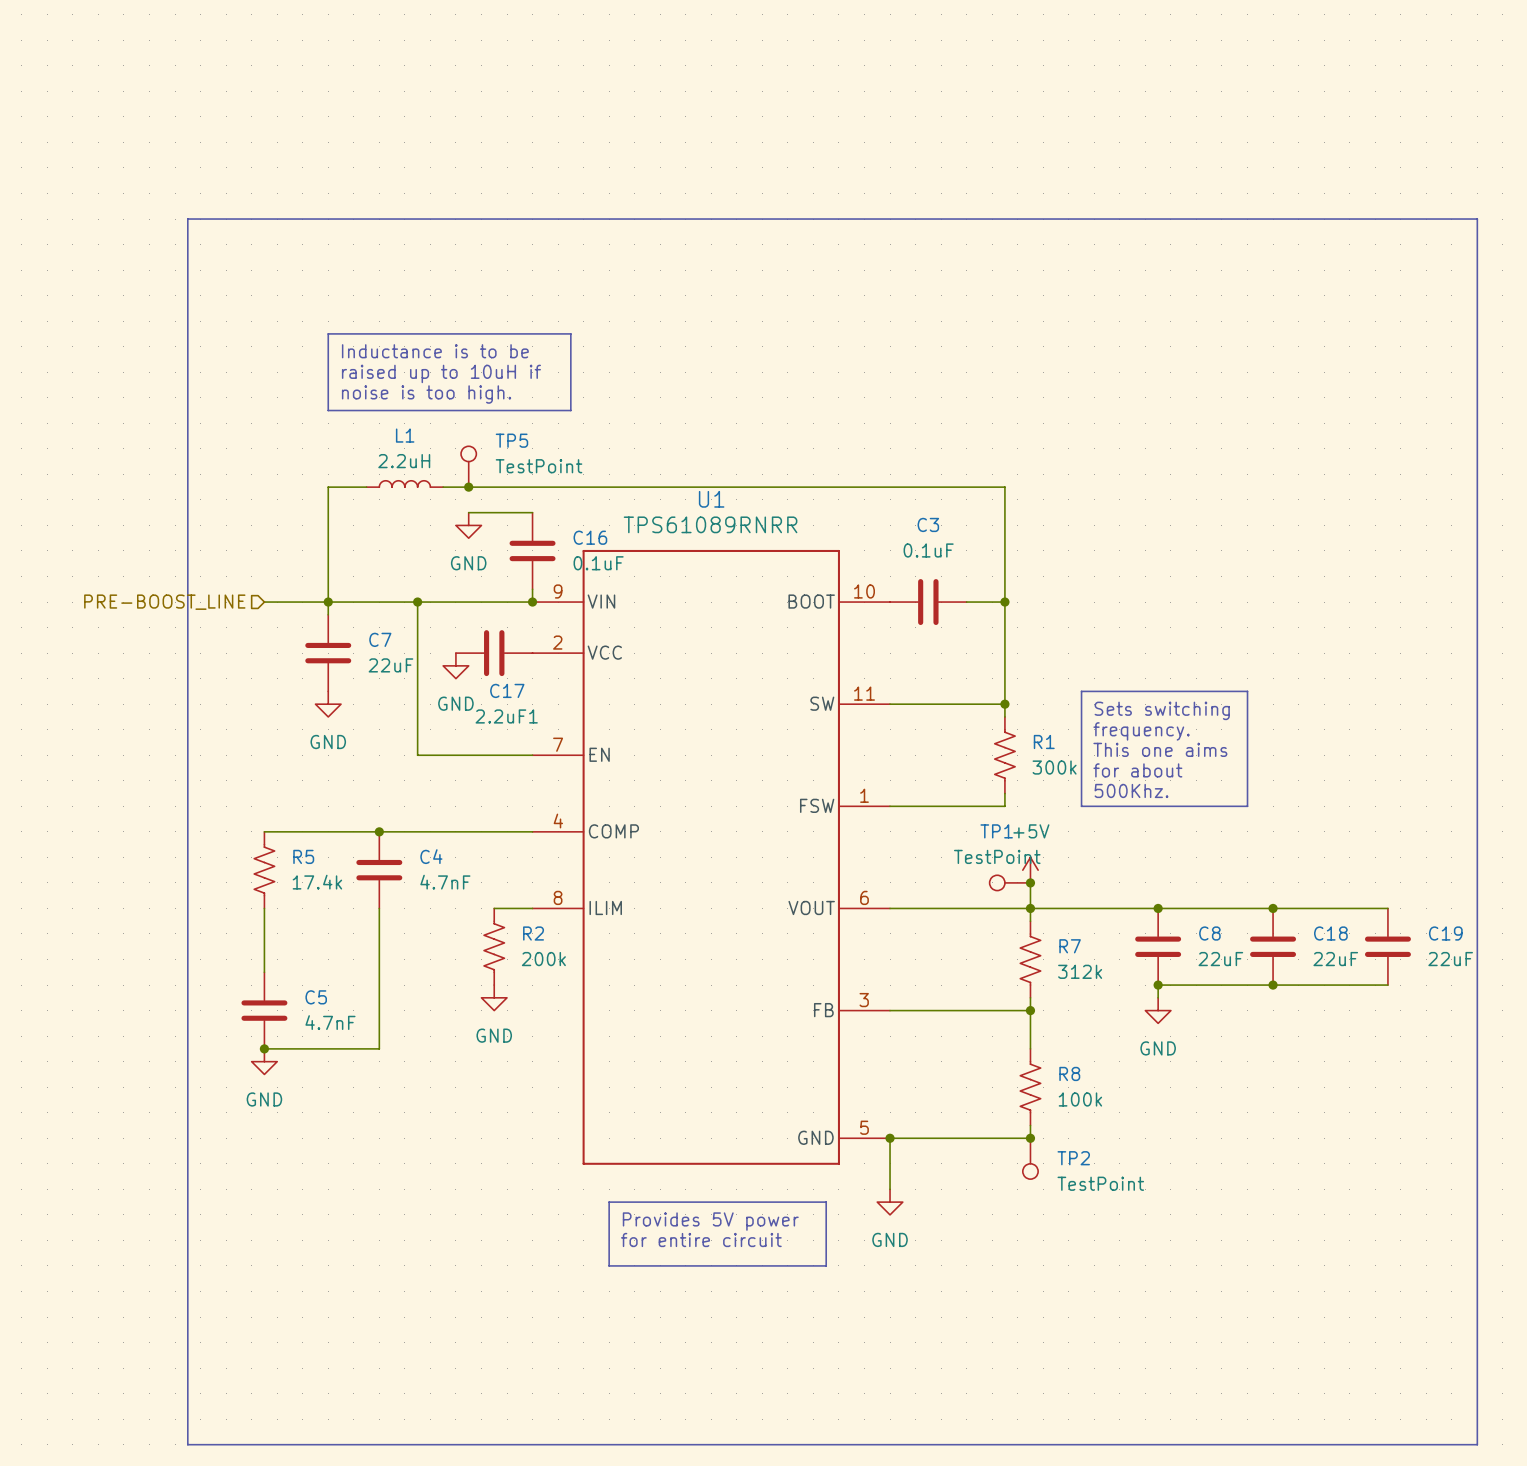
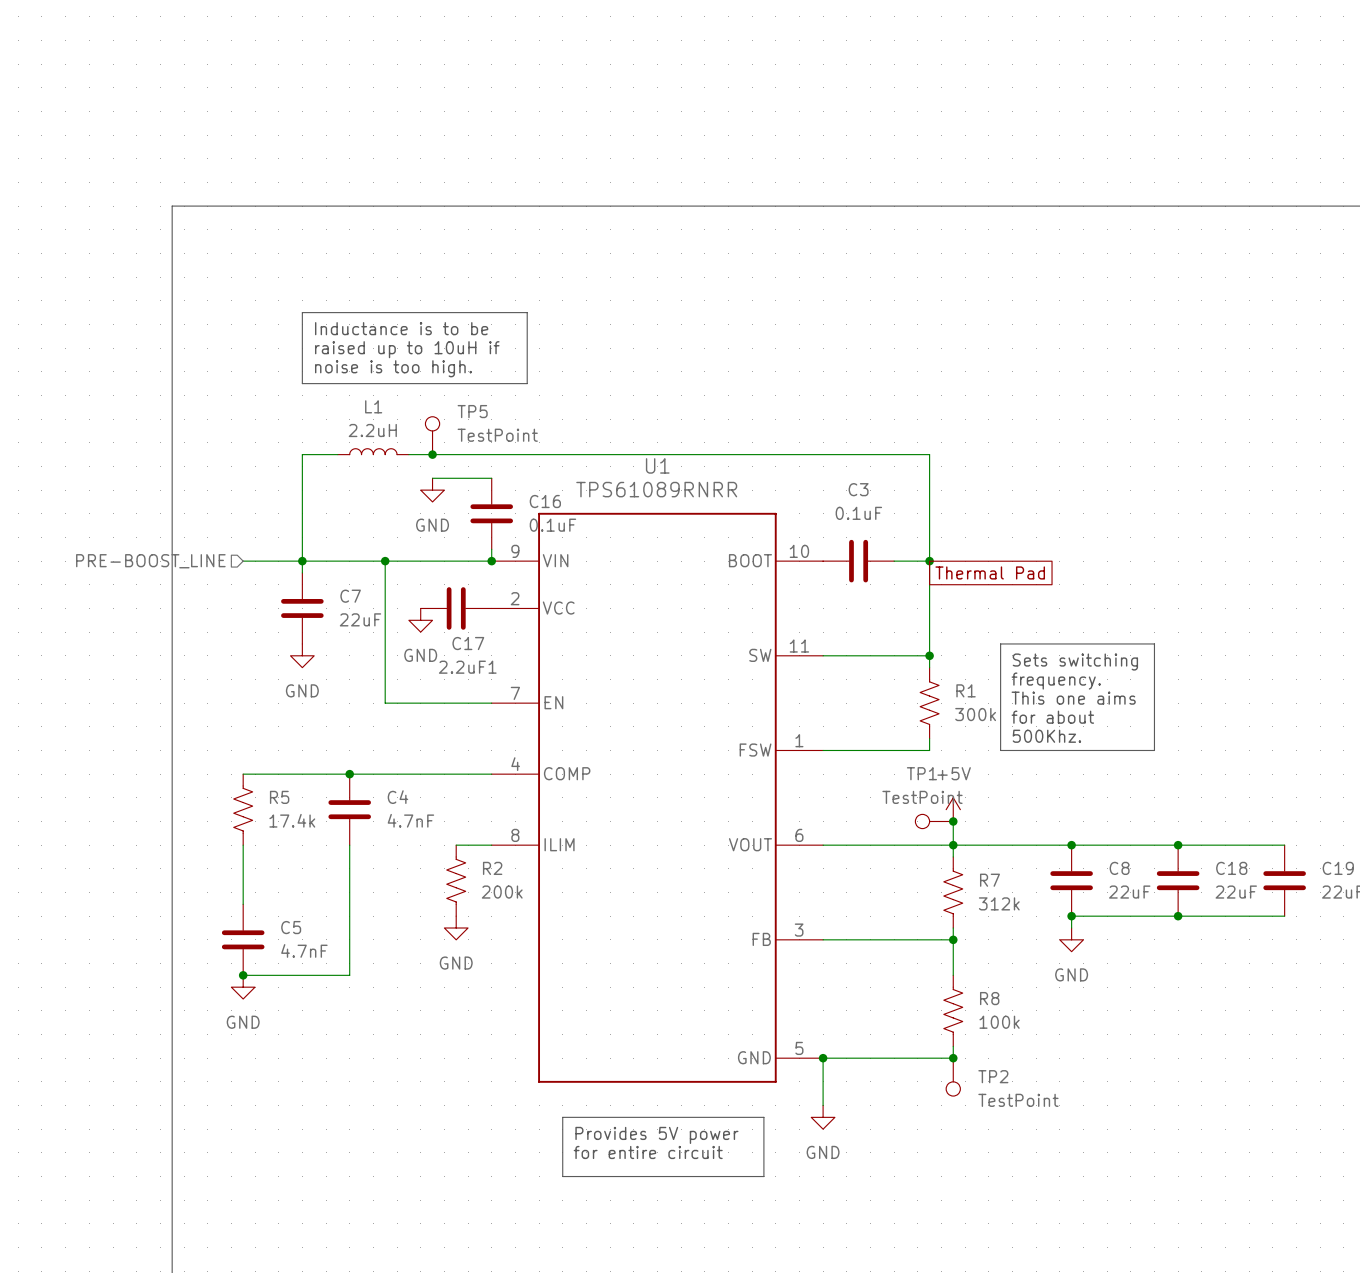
global label: none -> Thermal Pad (990, 572)

